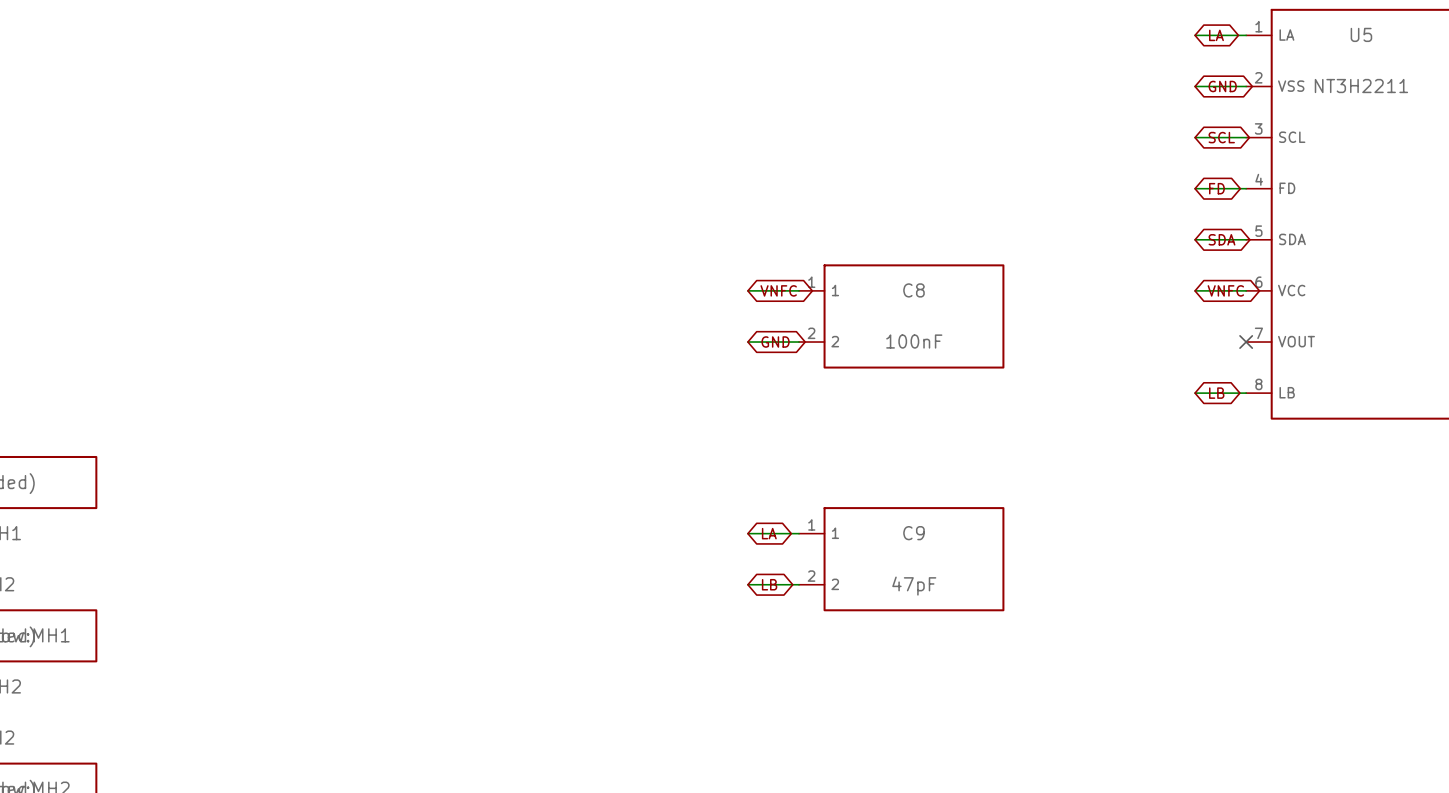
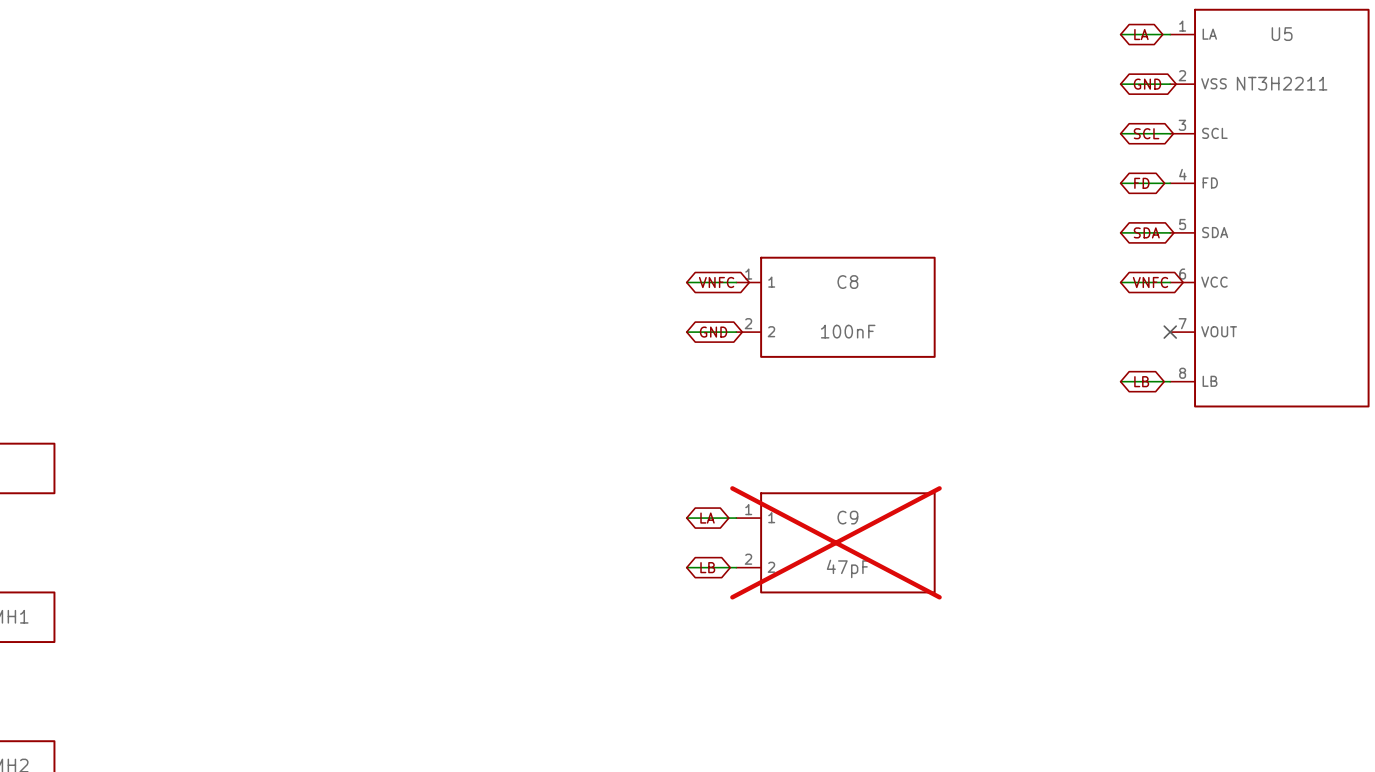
C9 do-not-place cross: none -> (835, 542)

